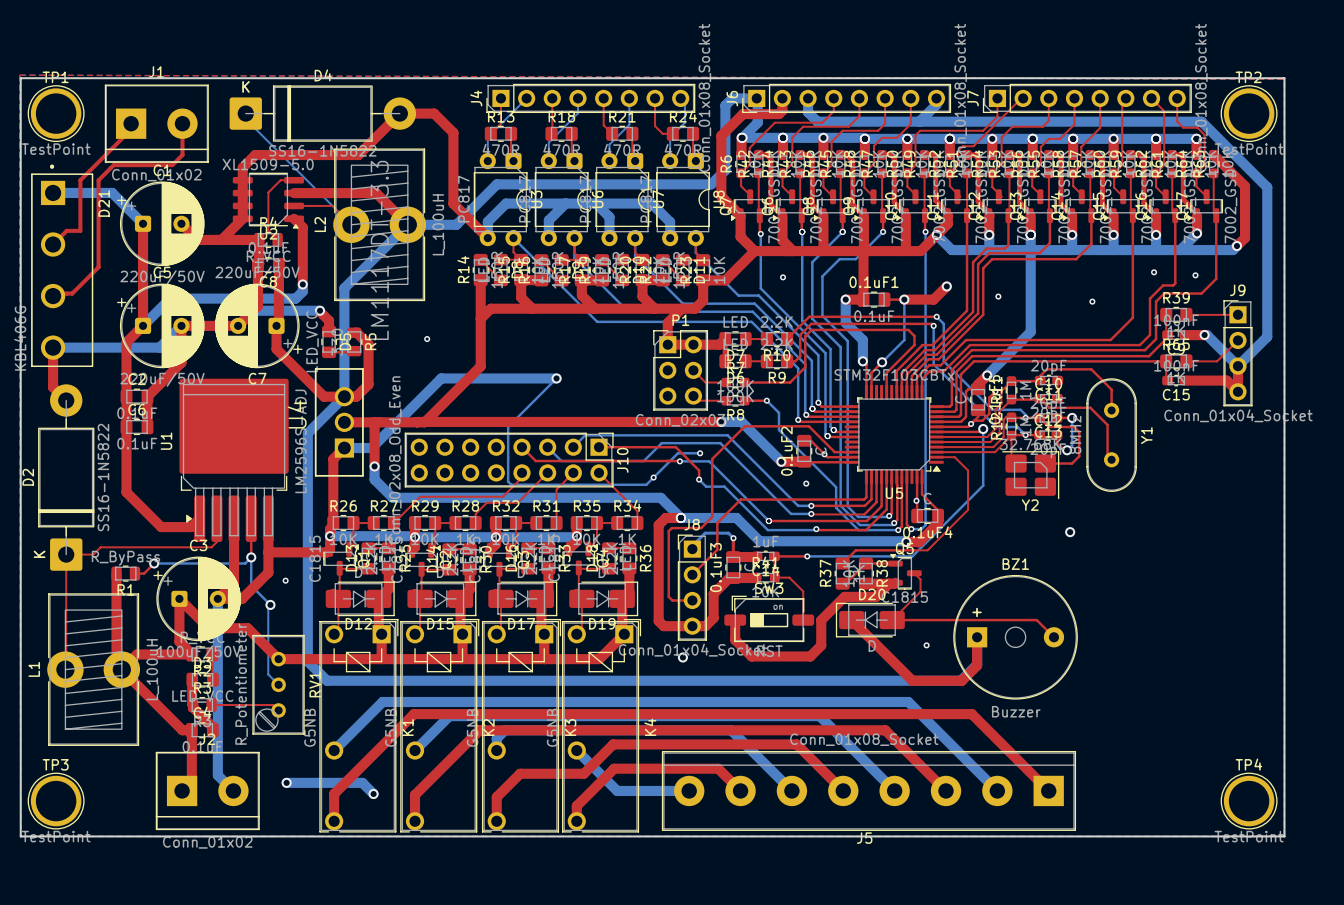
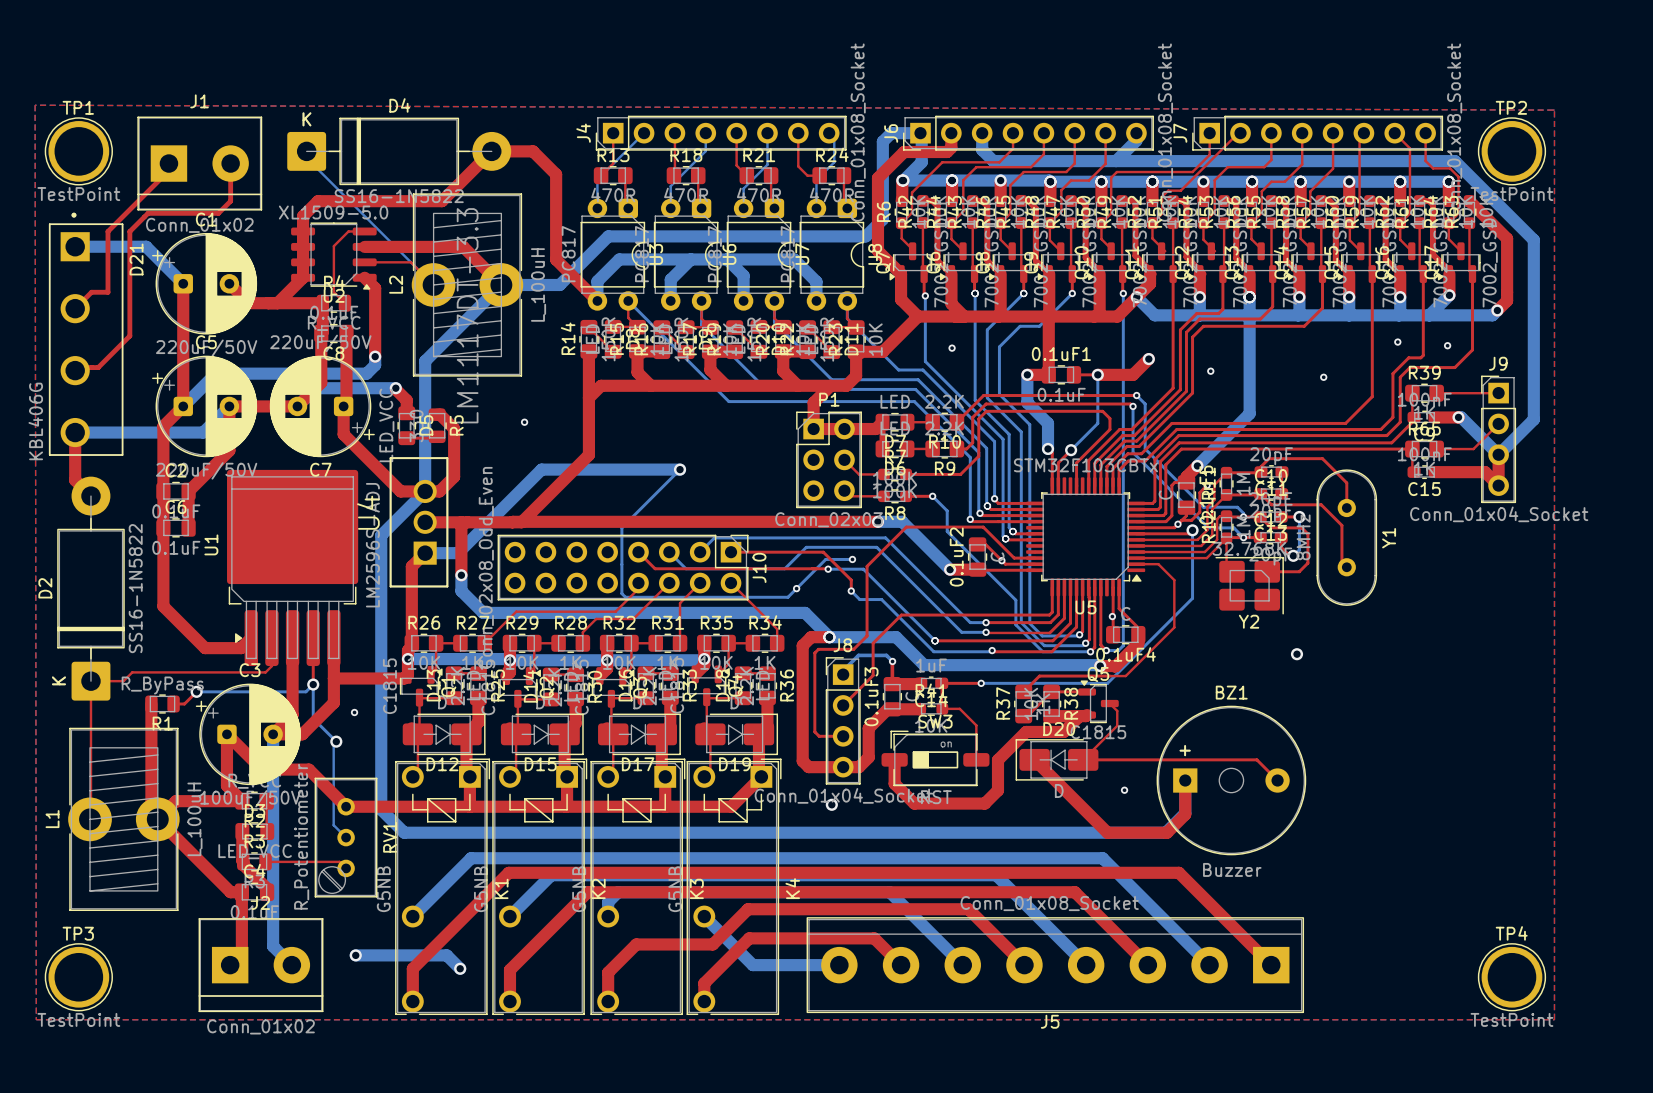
board edge: (20, 78) (1284, 78) (1284, 836) (20, 836) (20, 78) -> none
via: (806, 483) -> none

